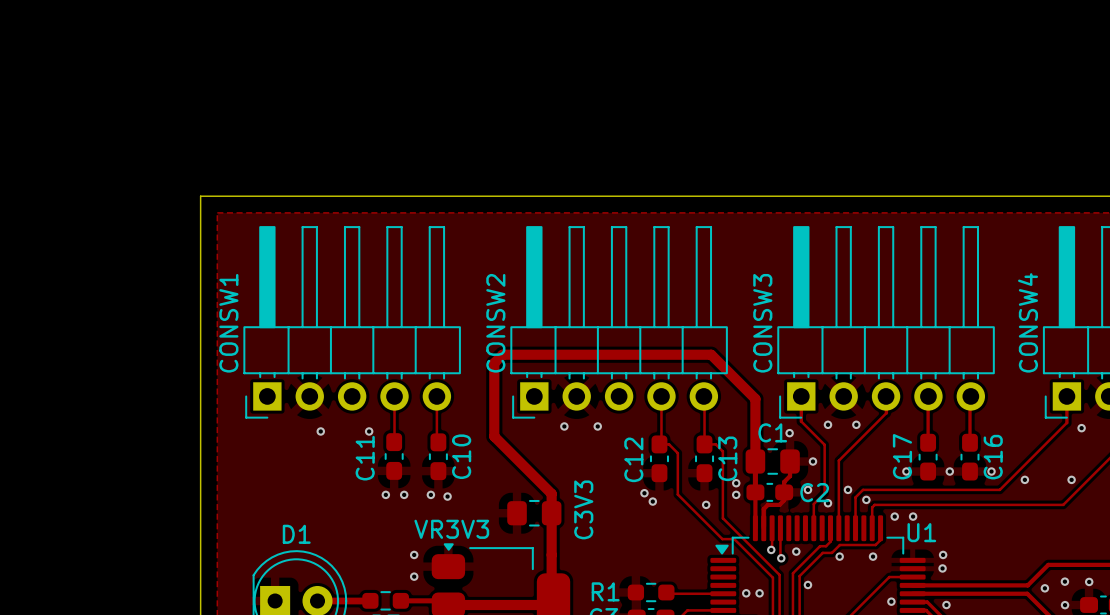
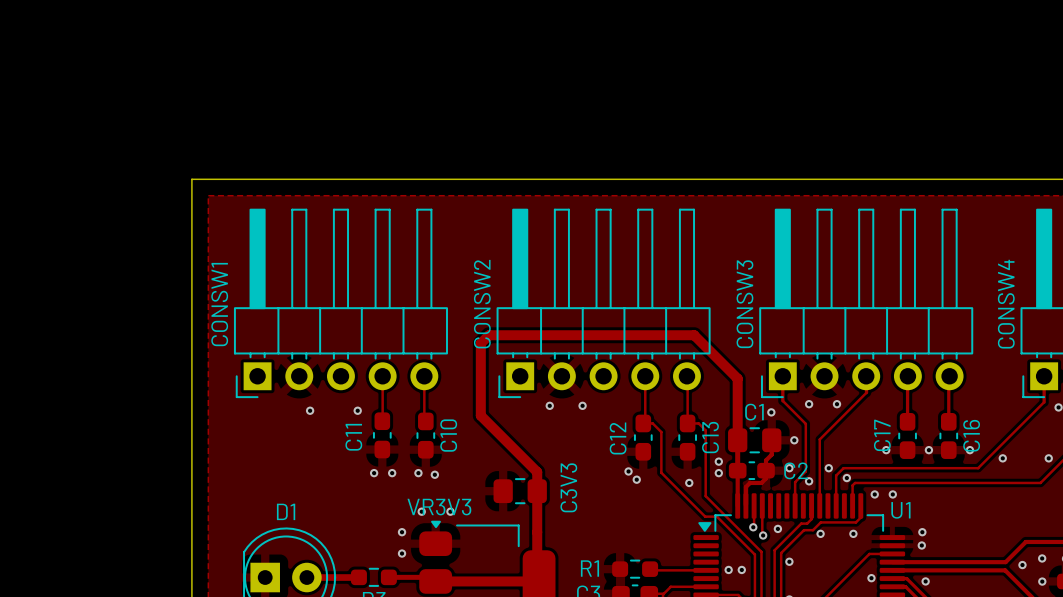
via: none -> (421, 511)
via: none -> (450, 511)

